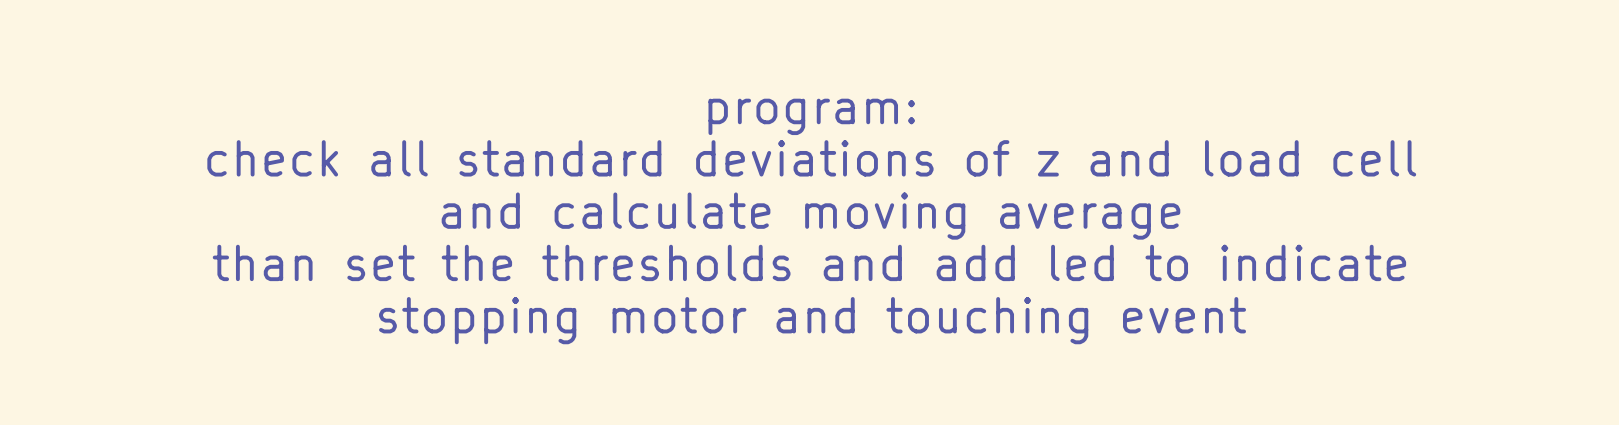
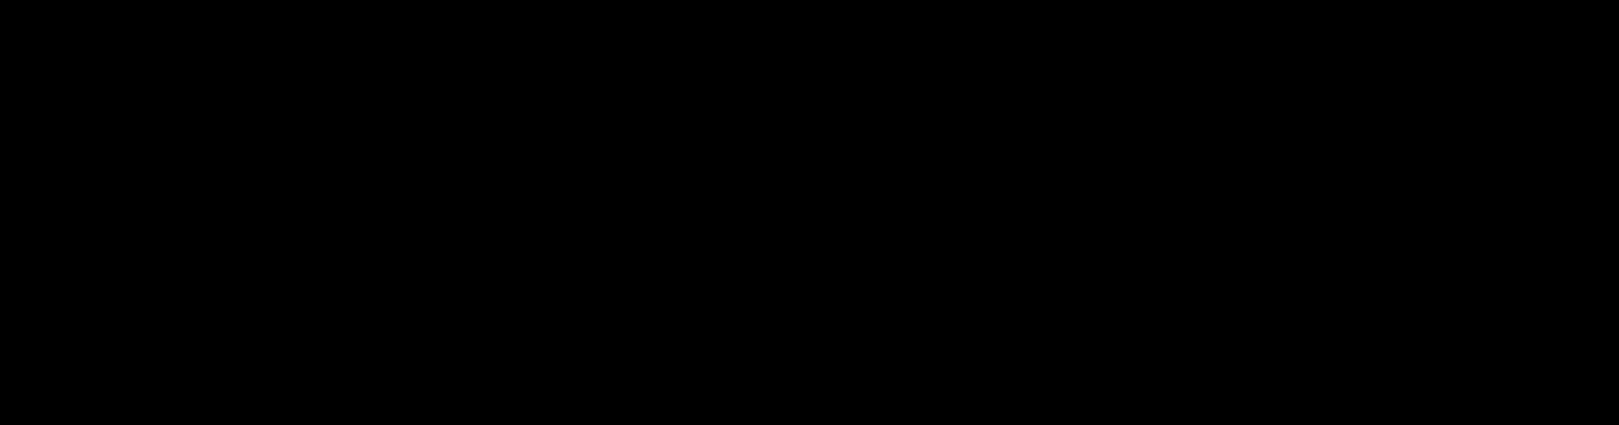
text: program: (811, 116) -> none
text: check all standard deviations of z and load cell (811, 158) -> none
text: and calculate moving average (810, 216) -> none
text: than set the thresholds and add led to indicate (809, 262) -> none
text: stopping motor and touching event (812, 320) -> none

